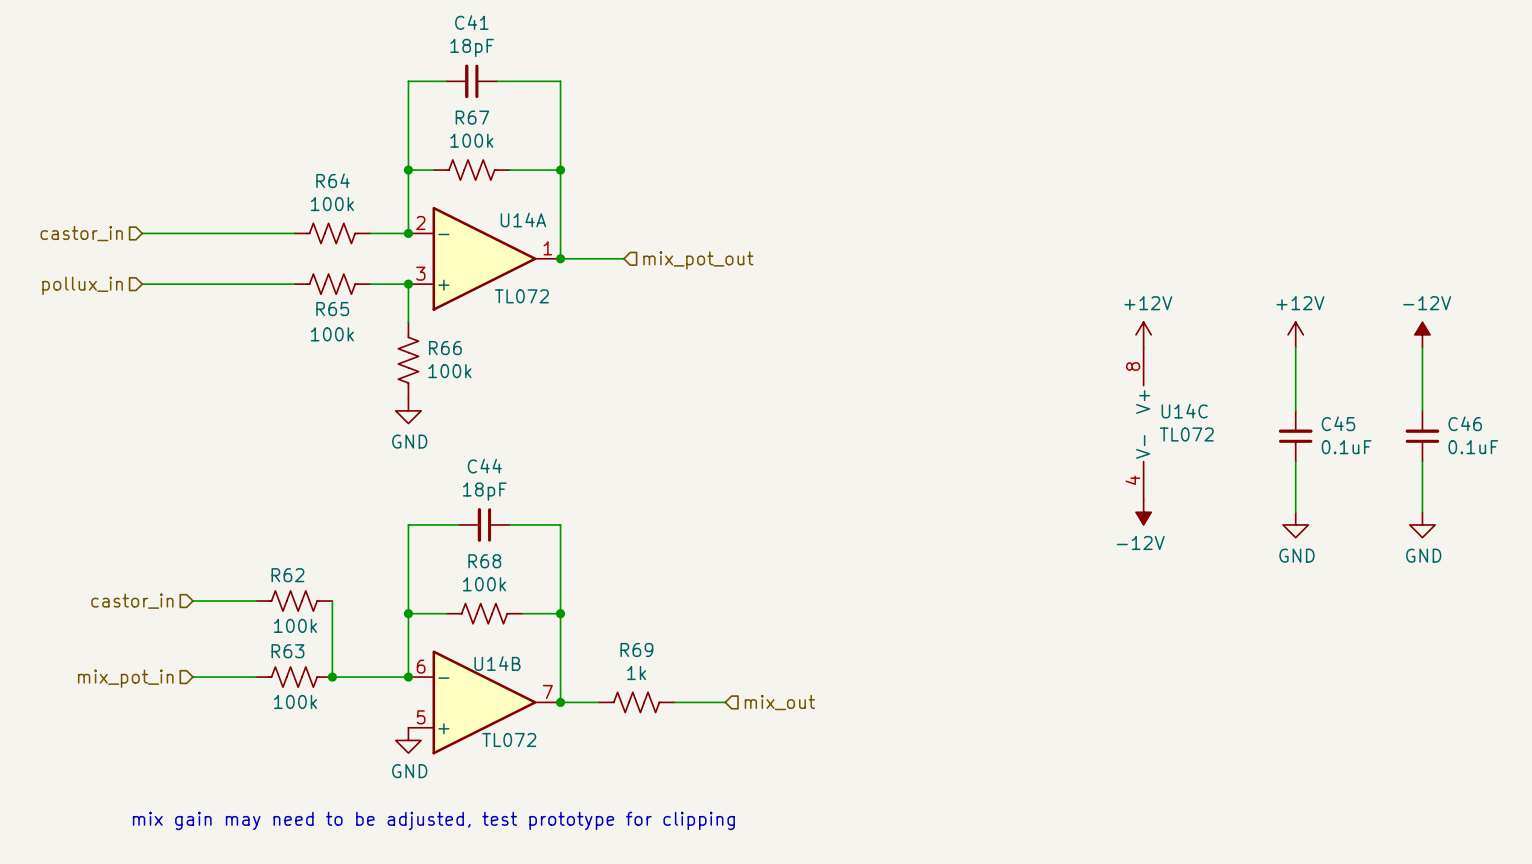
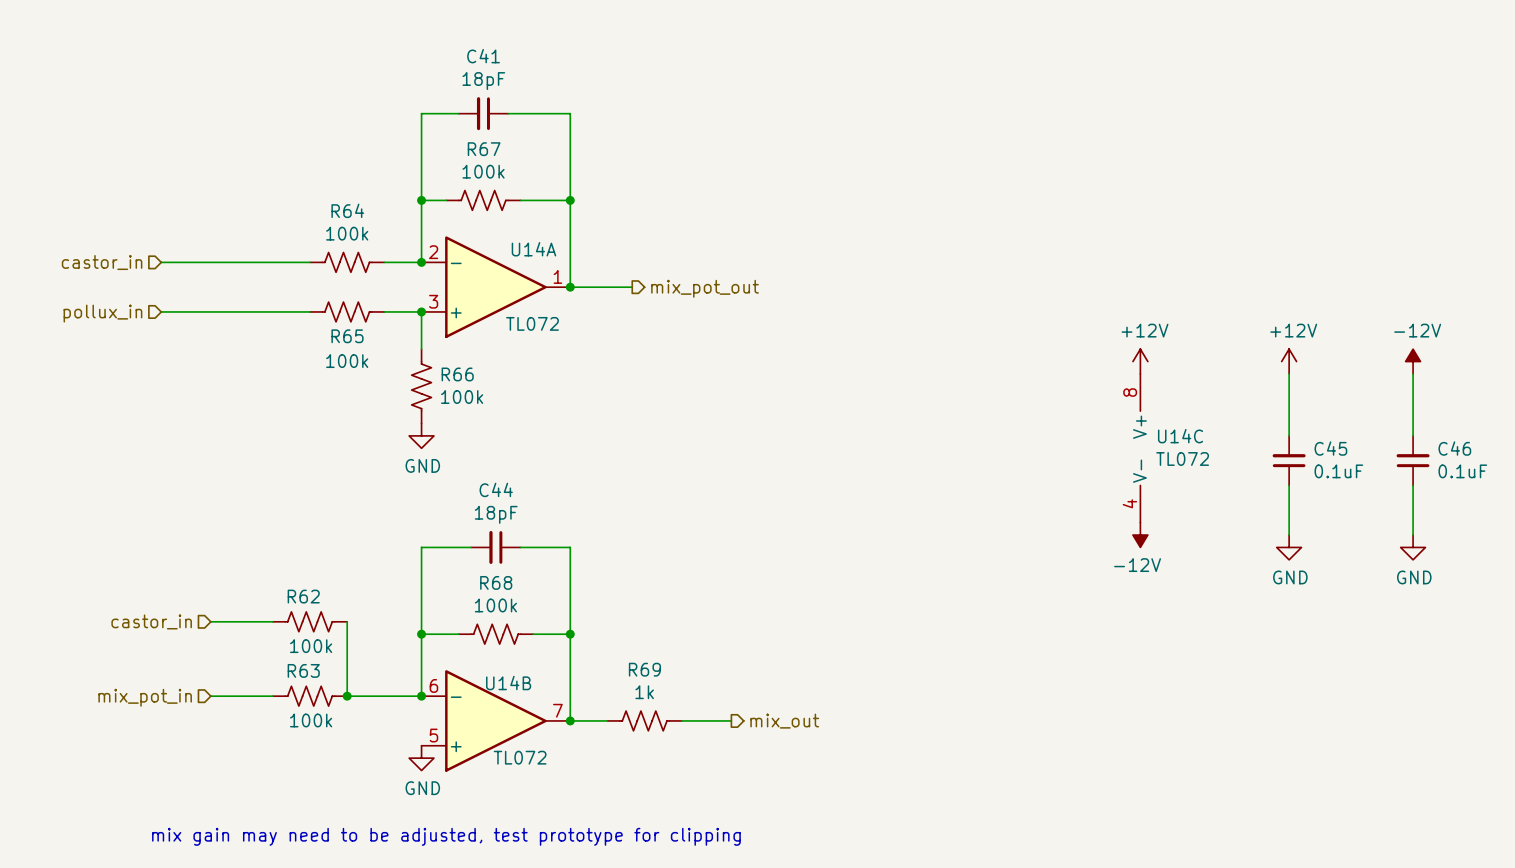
hierarchical label shape: input (698, 260) -> output (705, 288)
hierarchical label shape: input (779, 702) -> output (784, 721)

